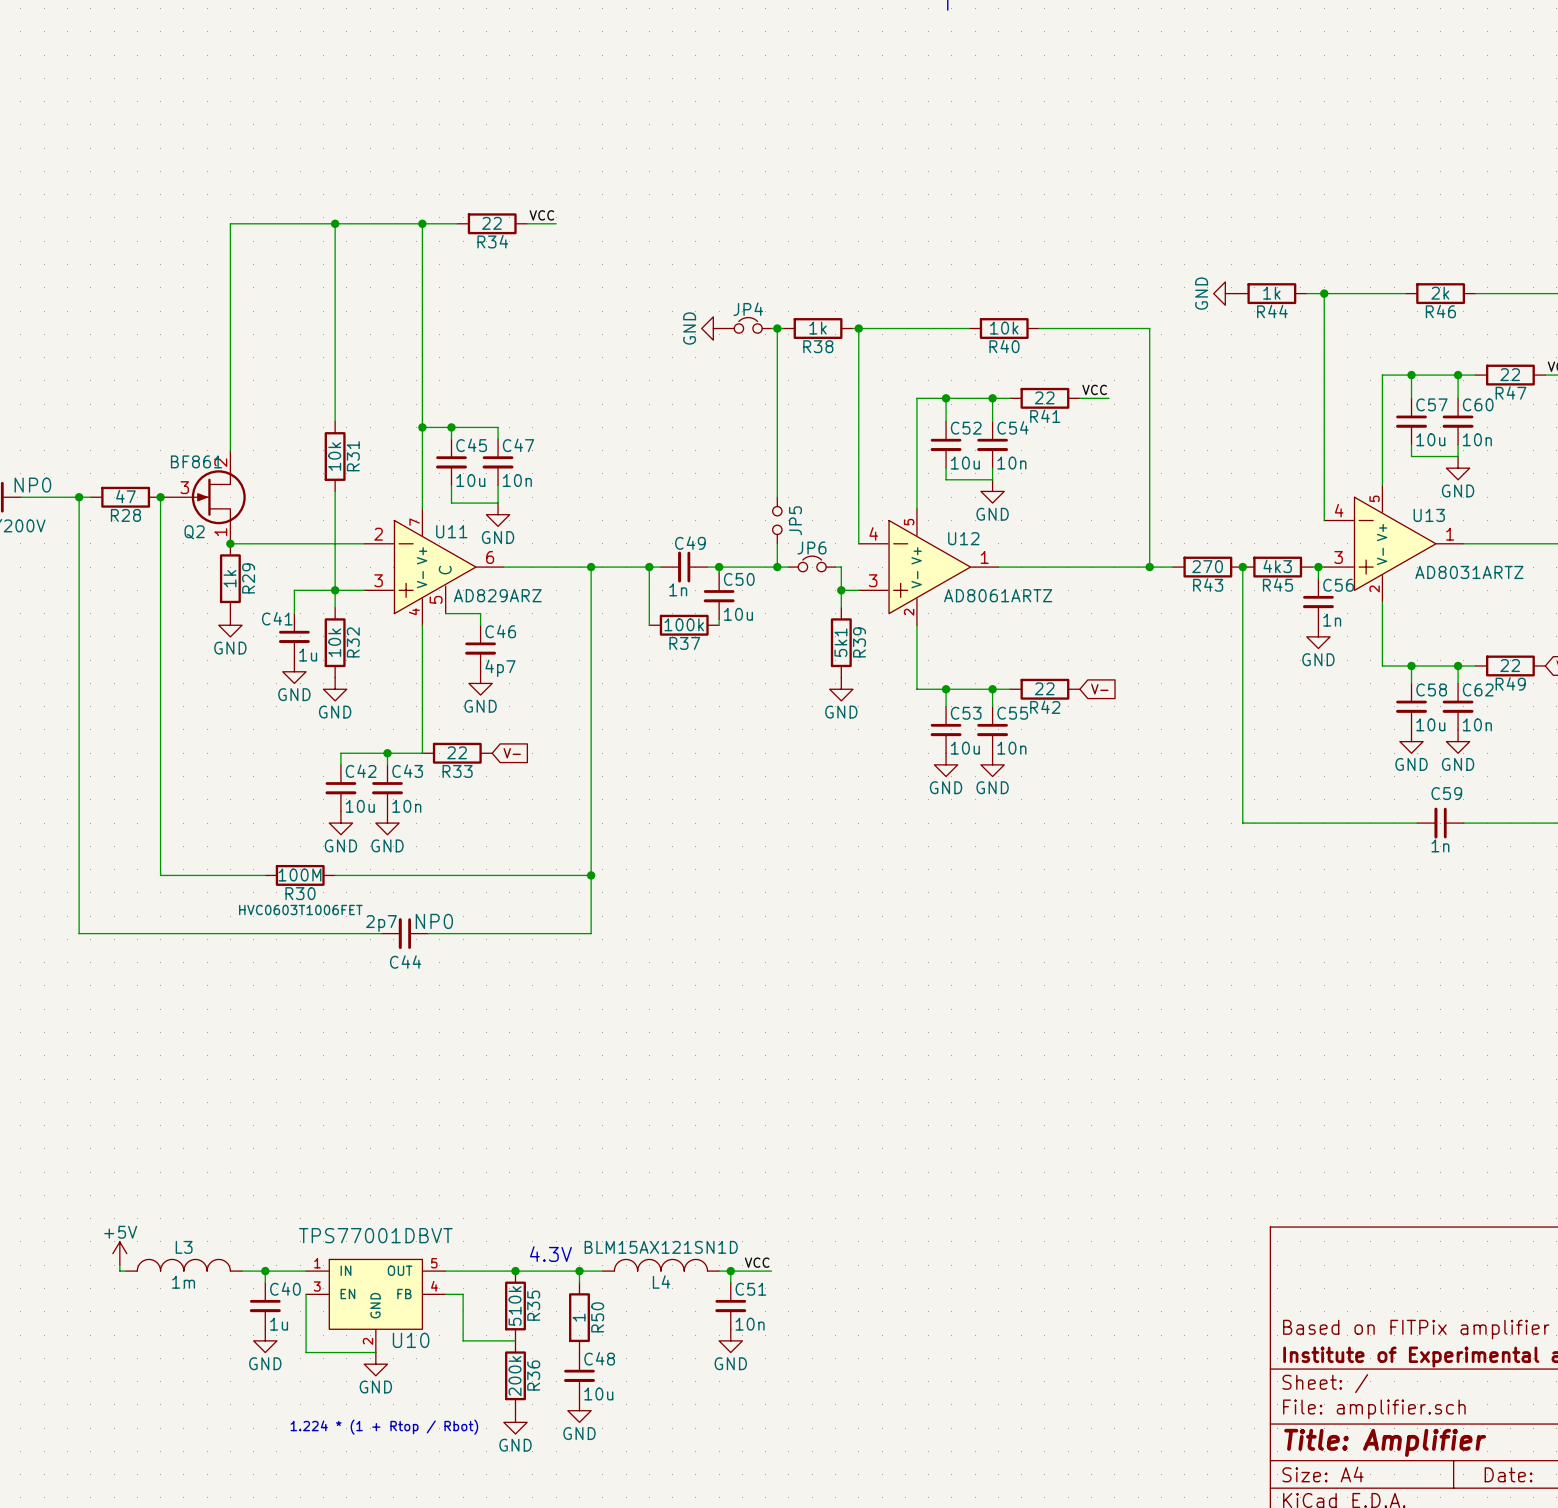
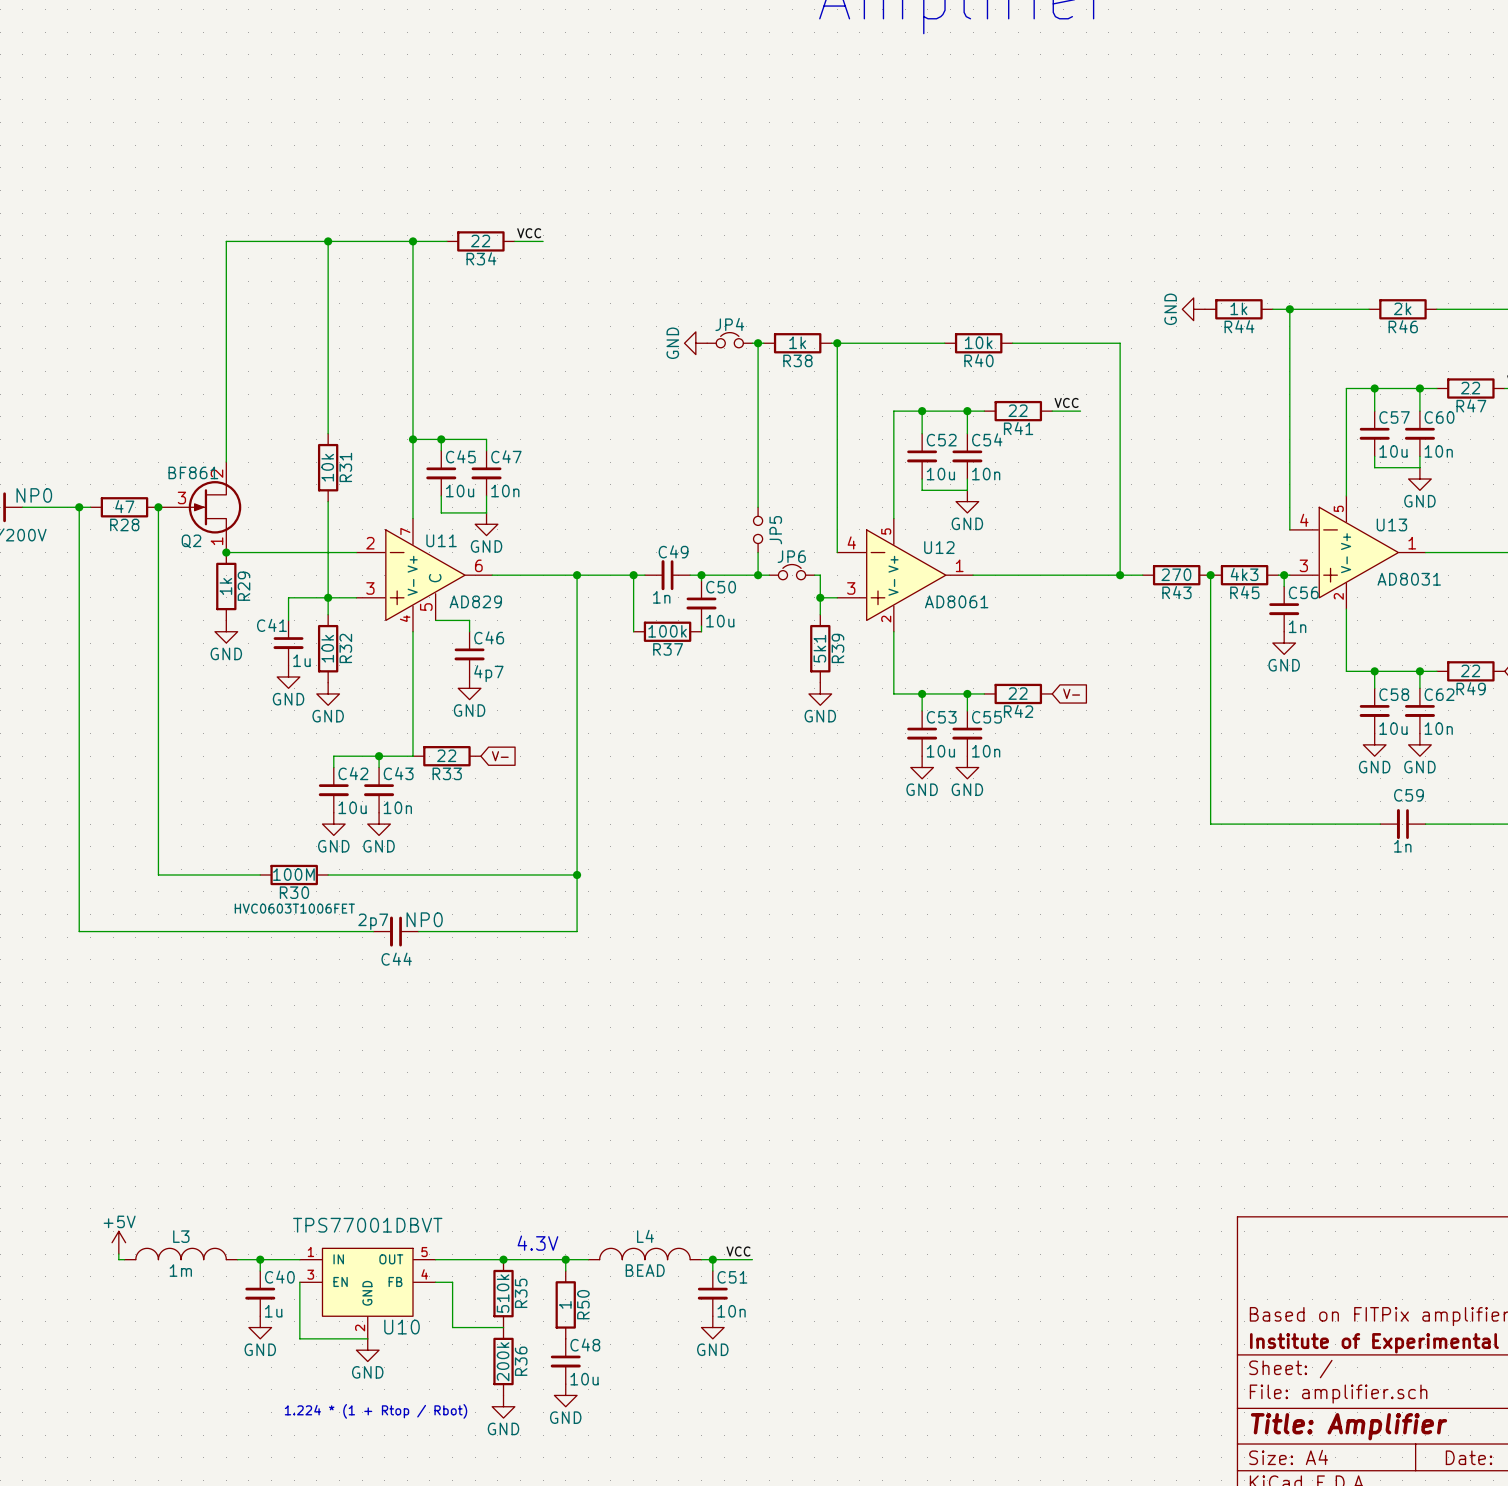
U13 value: AD8031ARTZ (1469, 572) -> AD8031 (1409, 579)
U11 value: AD829ARZ (497, 595) -> AD829 (475, 601)
U12 value: AD8061ARTZ (998, 595) -> AD8061 (956, 601)
L4 value: BLM15AX121SN1D (661, 1247) -> BEAD (645, 1270)
L4 name position: L4 (661, 1282) -> L4 (645, 1236)

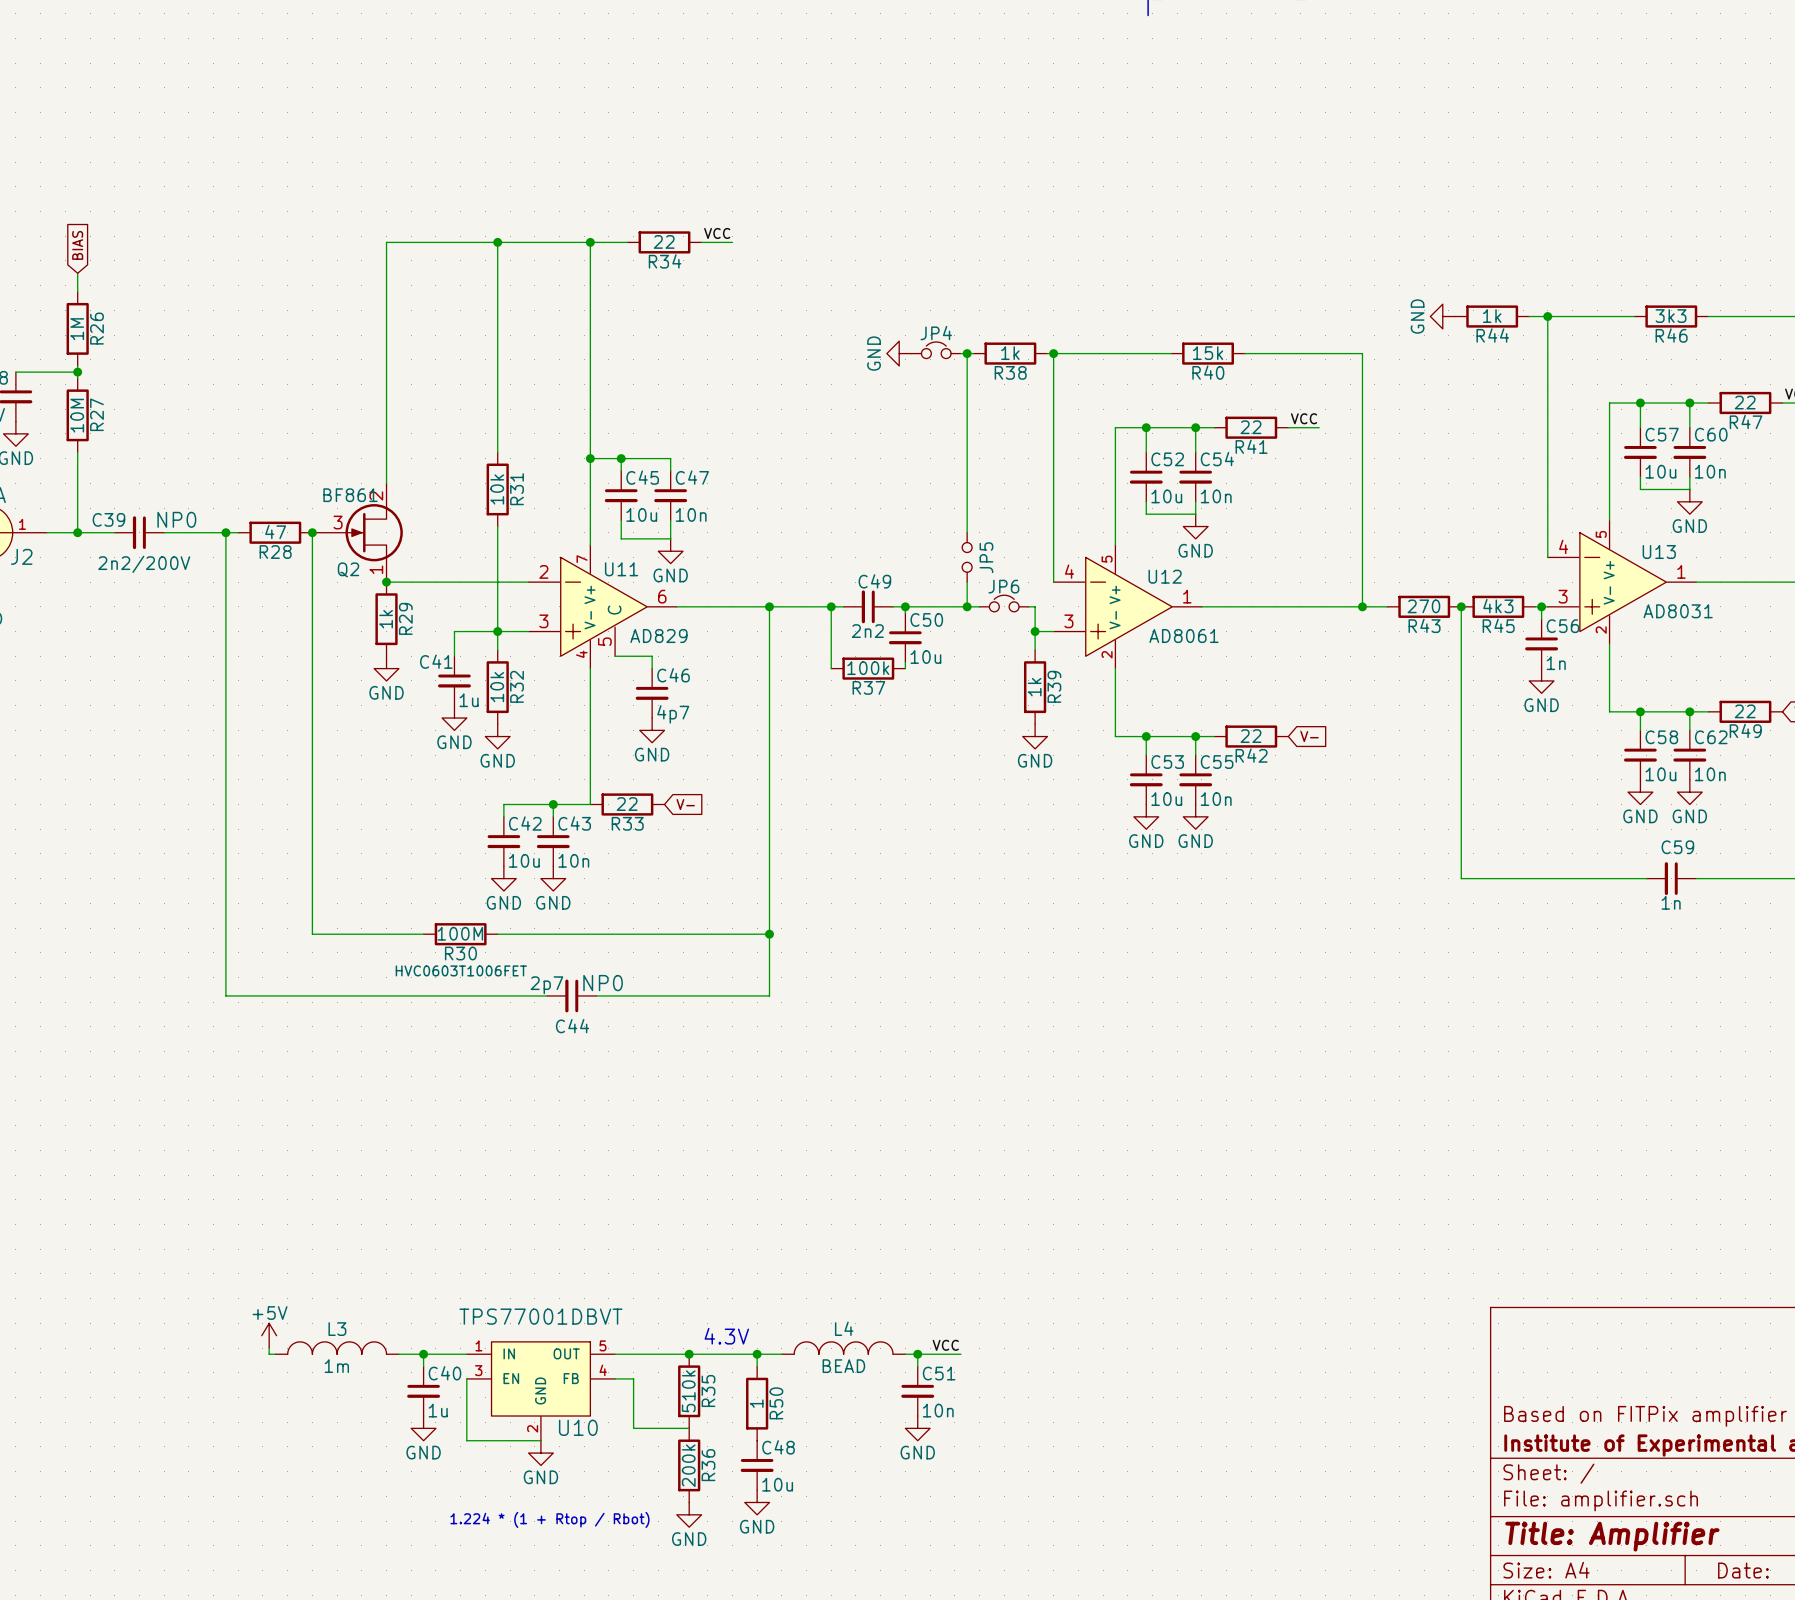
R46 value: 2k (1402, 308) -> 3k3 (1671, 316)
R40 value: 10k (978, 342) -> 15k (1208, 353)
C49 value: 1n (661, 597) -> 2n2 (867, 631)
R39 value: 5k1 (819, 648) -> 1k (1034, 687)

